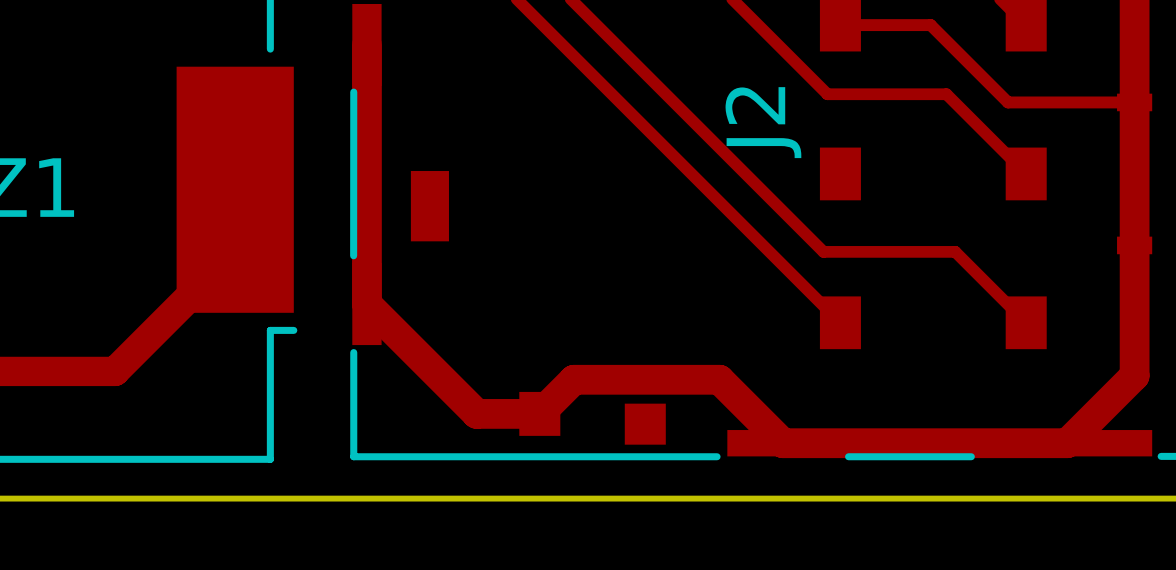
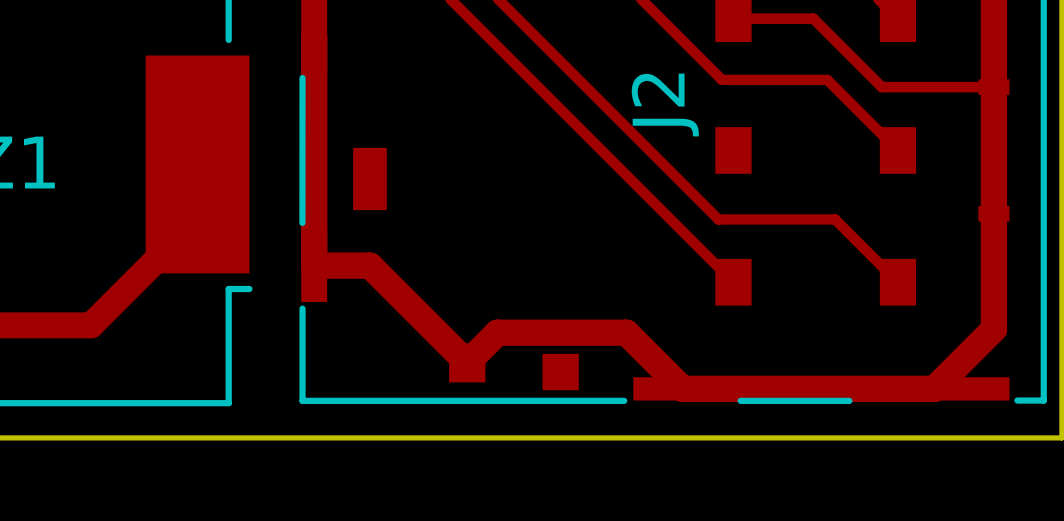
top track: (366, 304) (476, 413) (539, 413) -> (314, 265) (369, 265) (467, 362)

